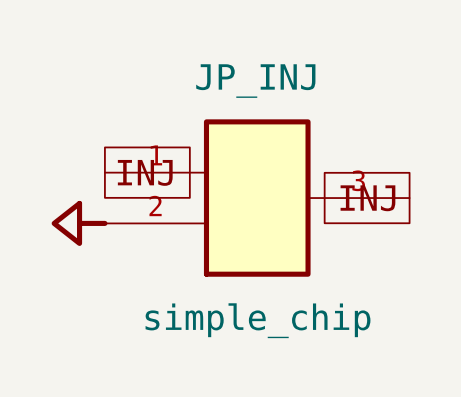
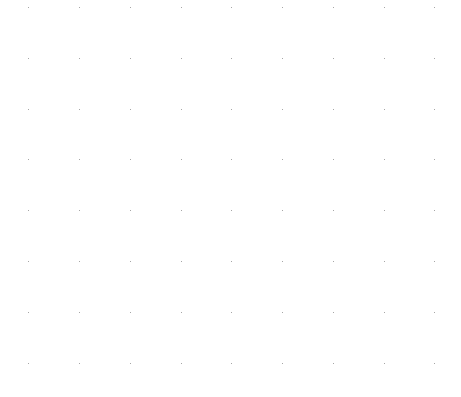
global label: INJ (145, 172) -> none
JP_INJ: simple_chip (257, 198) -> none
global label: INJ (367, 198) -> none
power symbol: (79, 223) -> none

